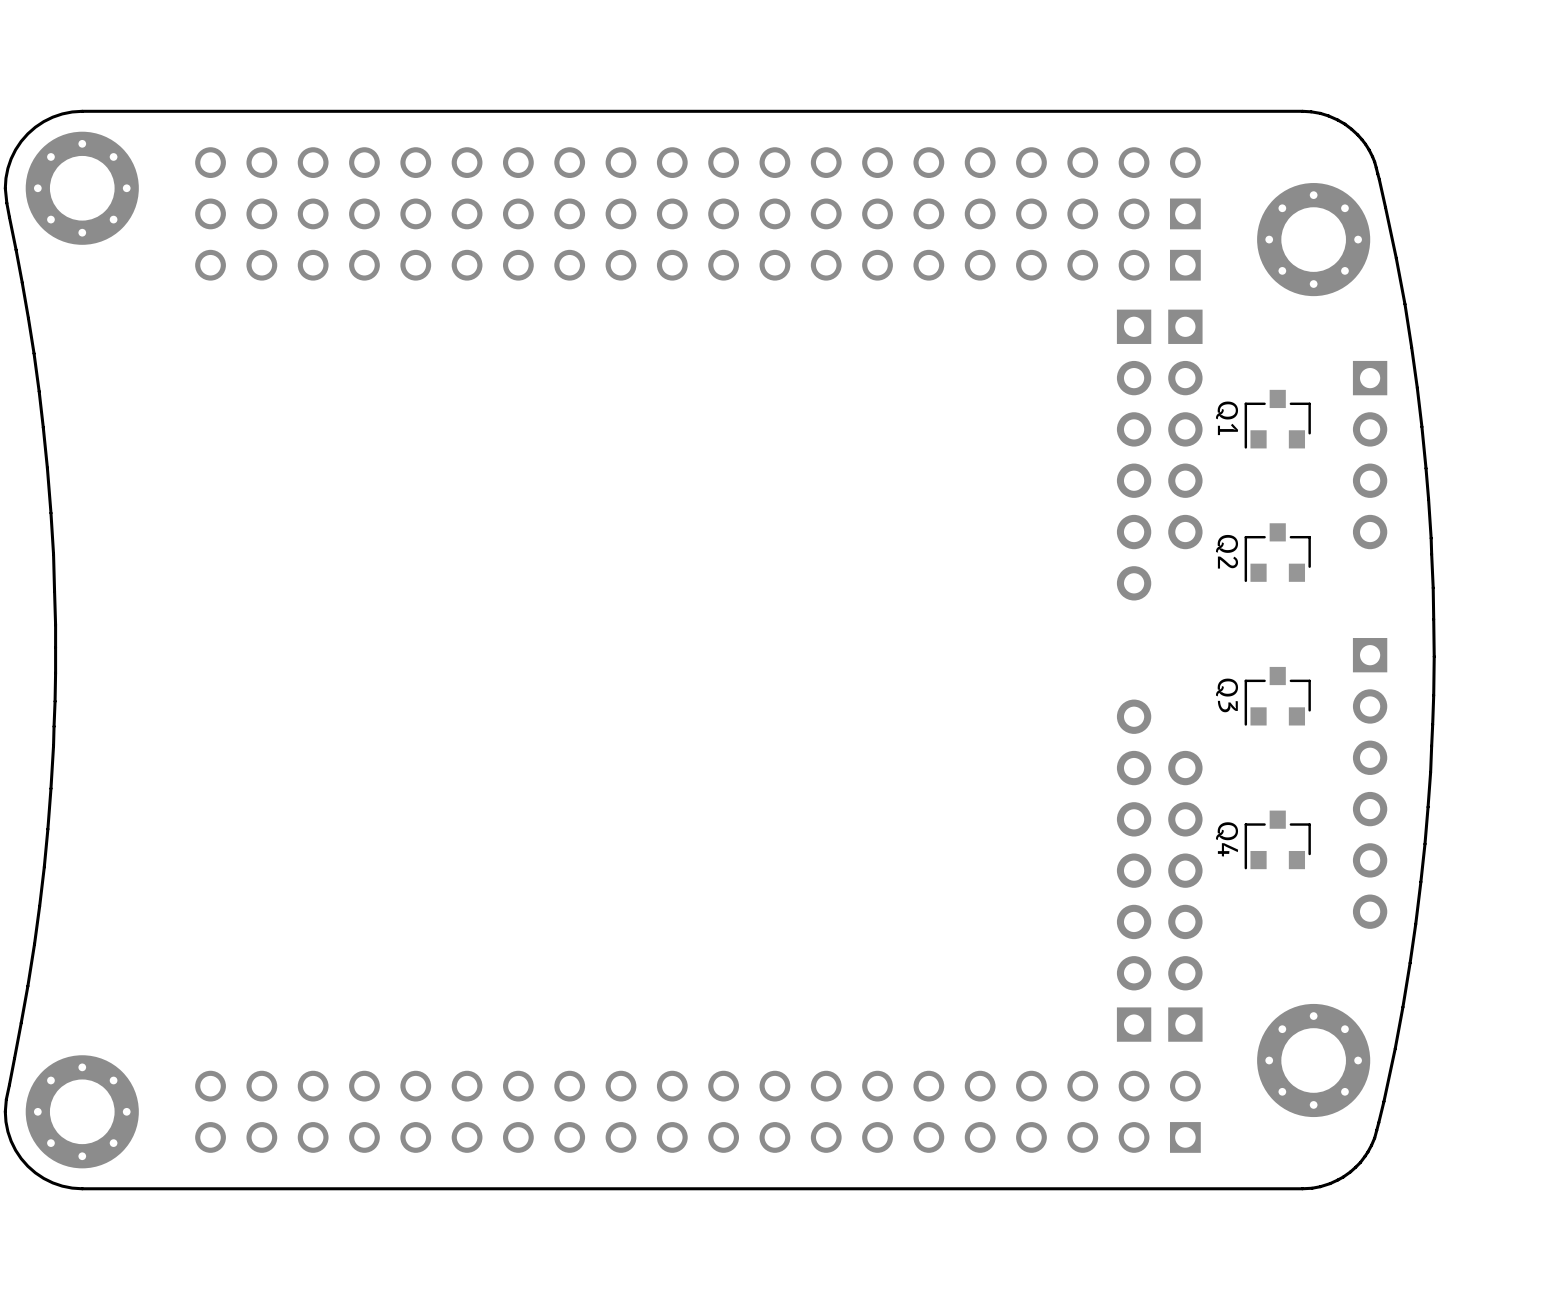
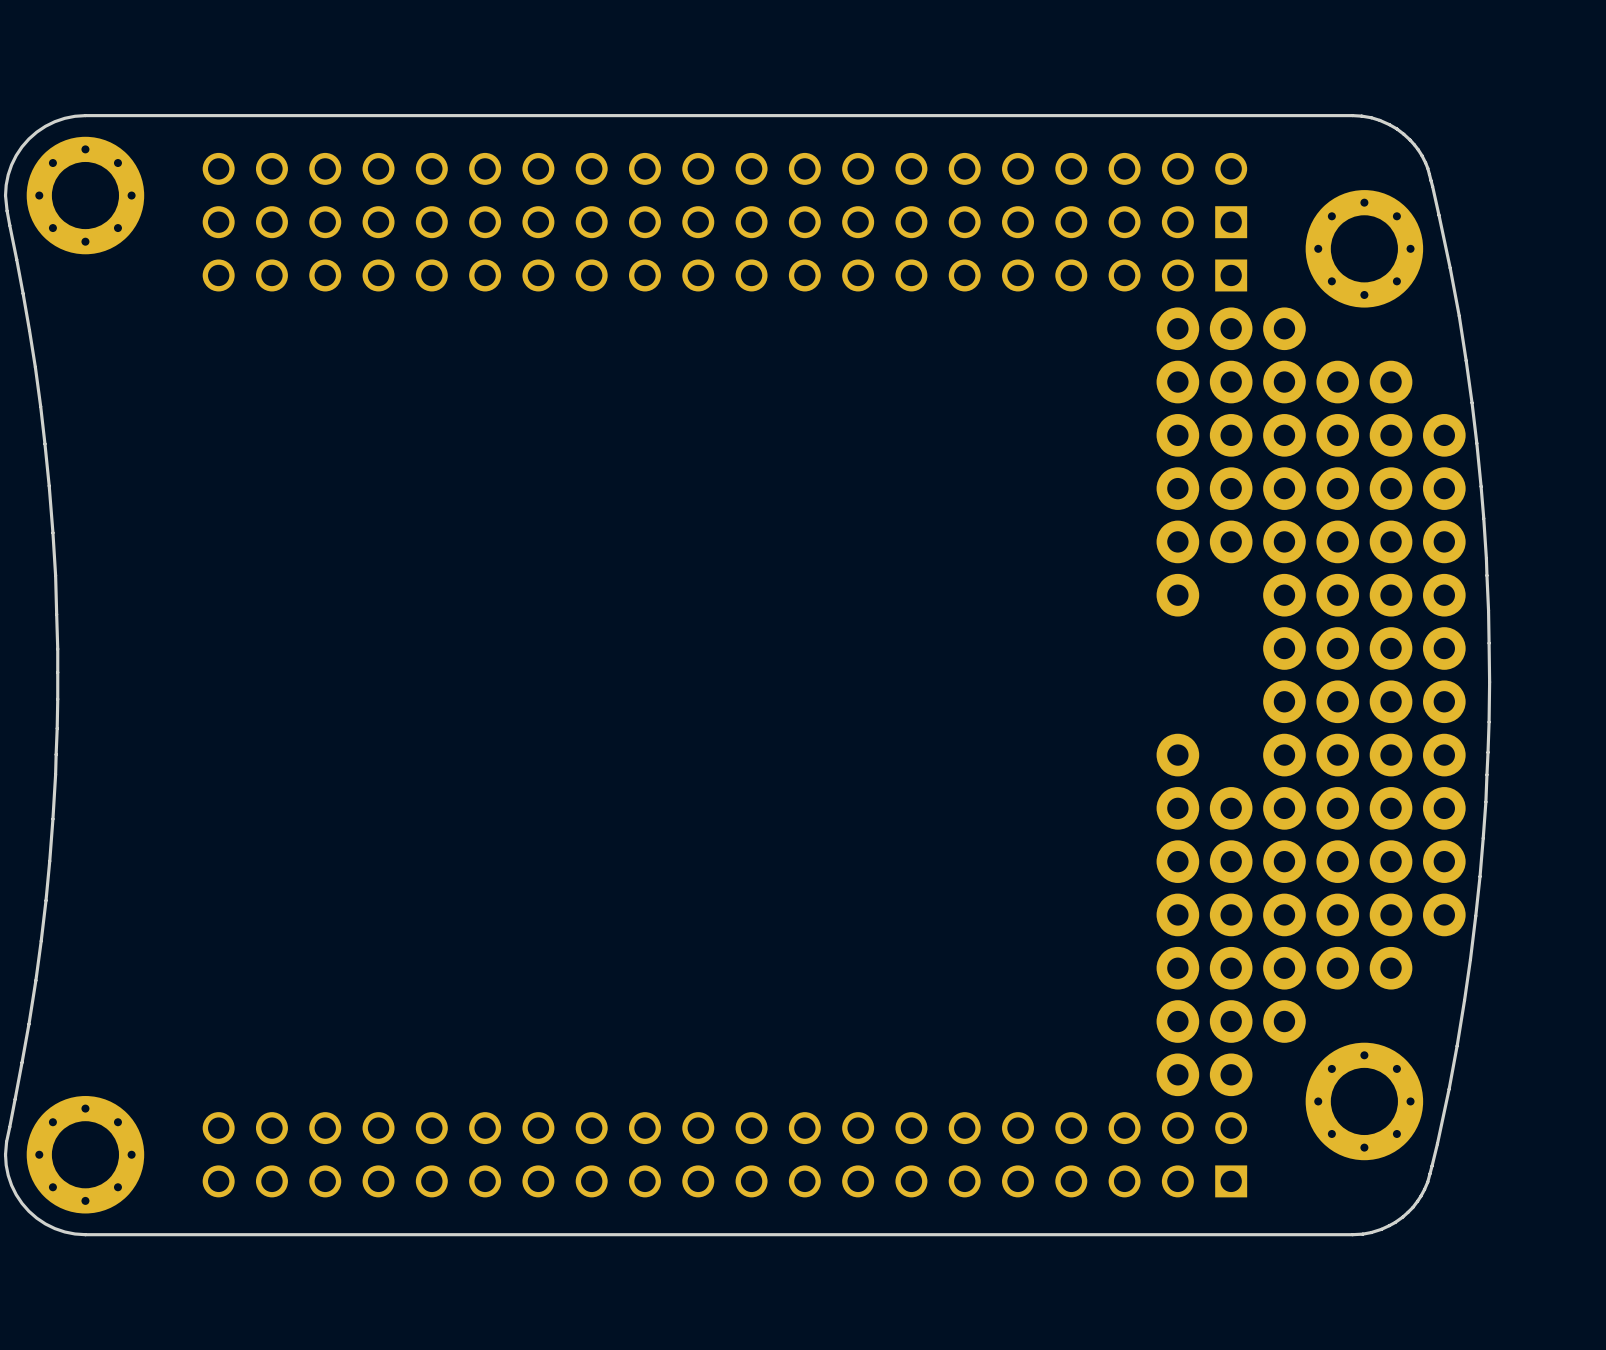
Q1: (1277, 419) -> none
part: (1185, 429) -> none
part: (1134, 455) -> none
part: (1370, 455) -> none
Q2: (1277, 552) -> none
part: none -> (1311, 701)
Q3: (1277, 696) -> none
part: (1370, 783) -> none
Q4: (1277, 839) -> none
part: (1134, 870) -> none
part: (1185, 896) -> none

